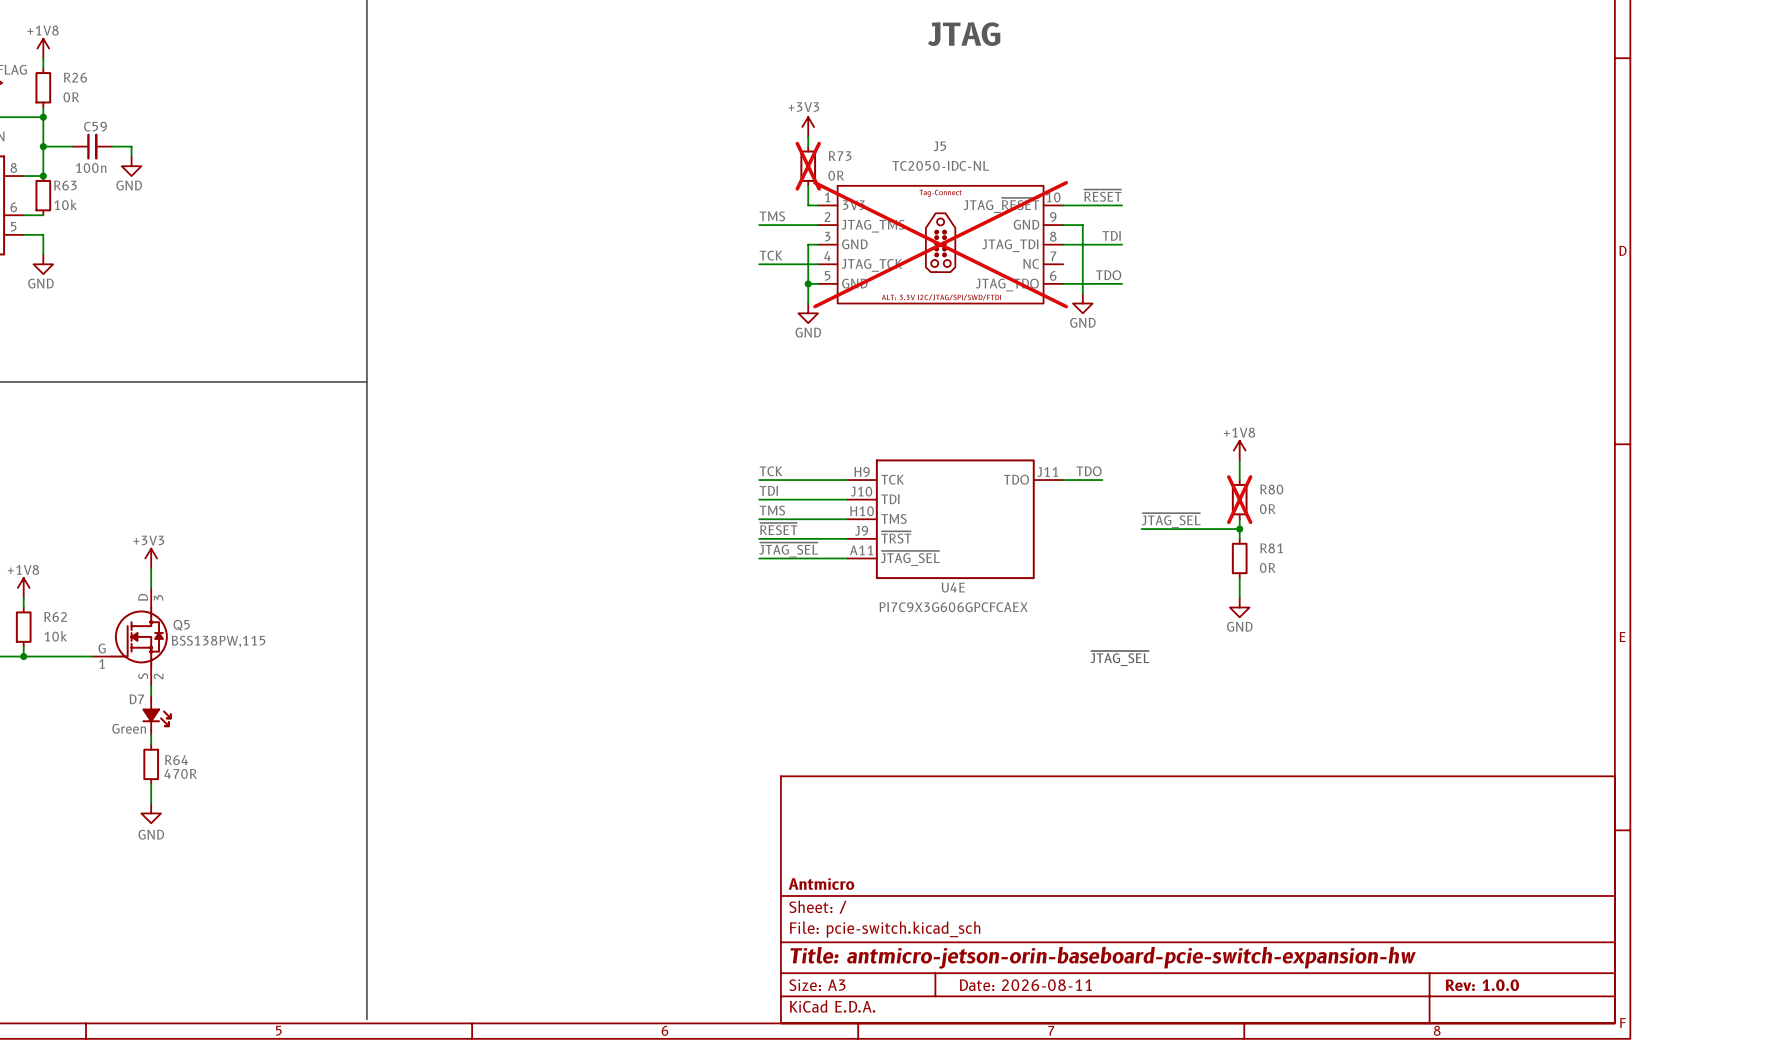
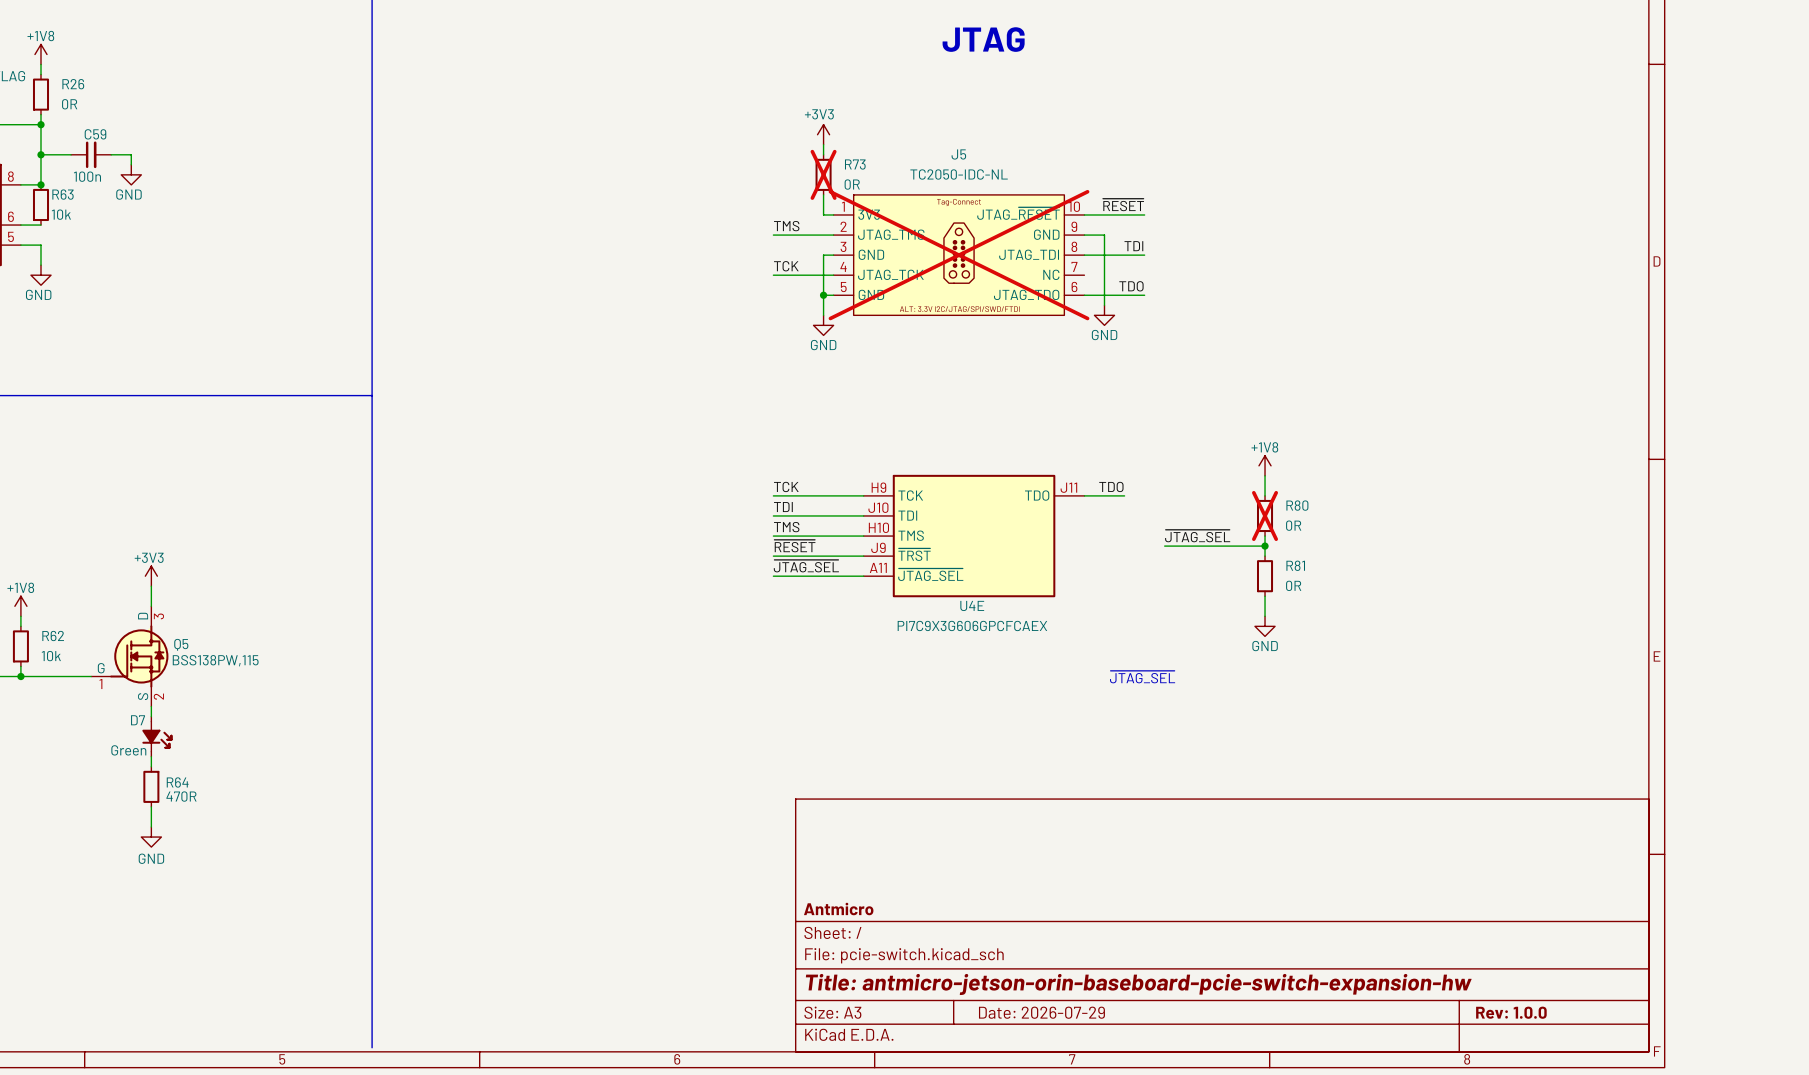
title block: Date: 2026-08-11 (1025, 985) -> Date: 2026-07-29 (1041, 1012)

